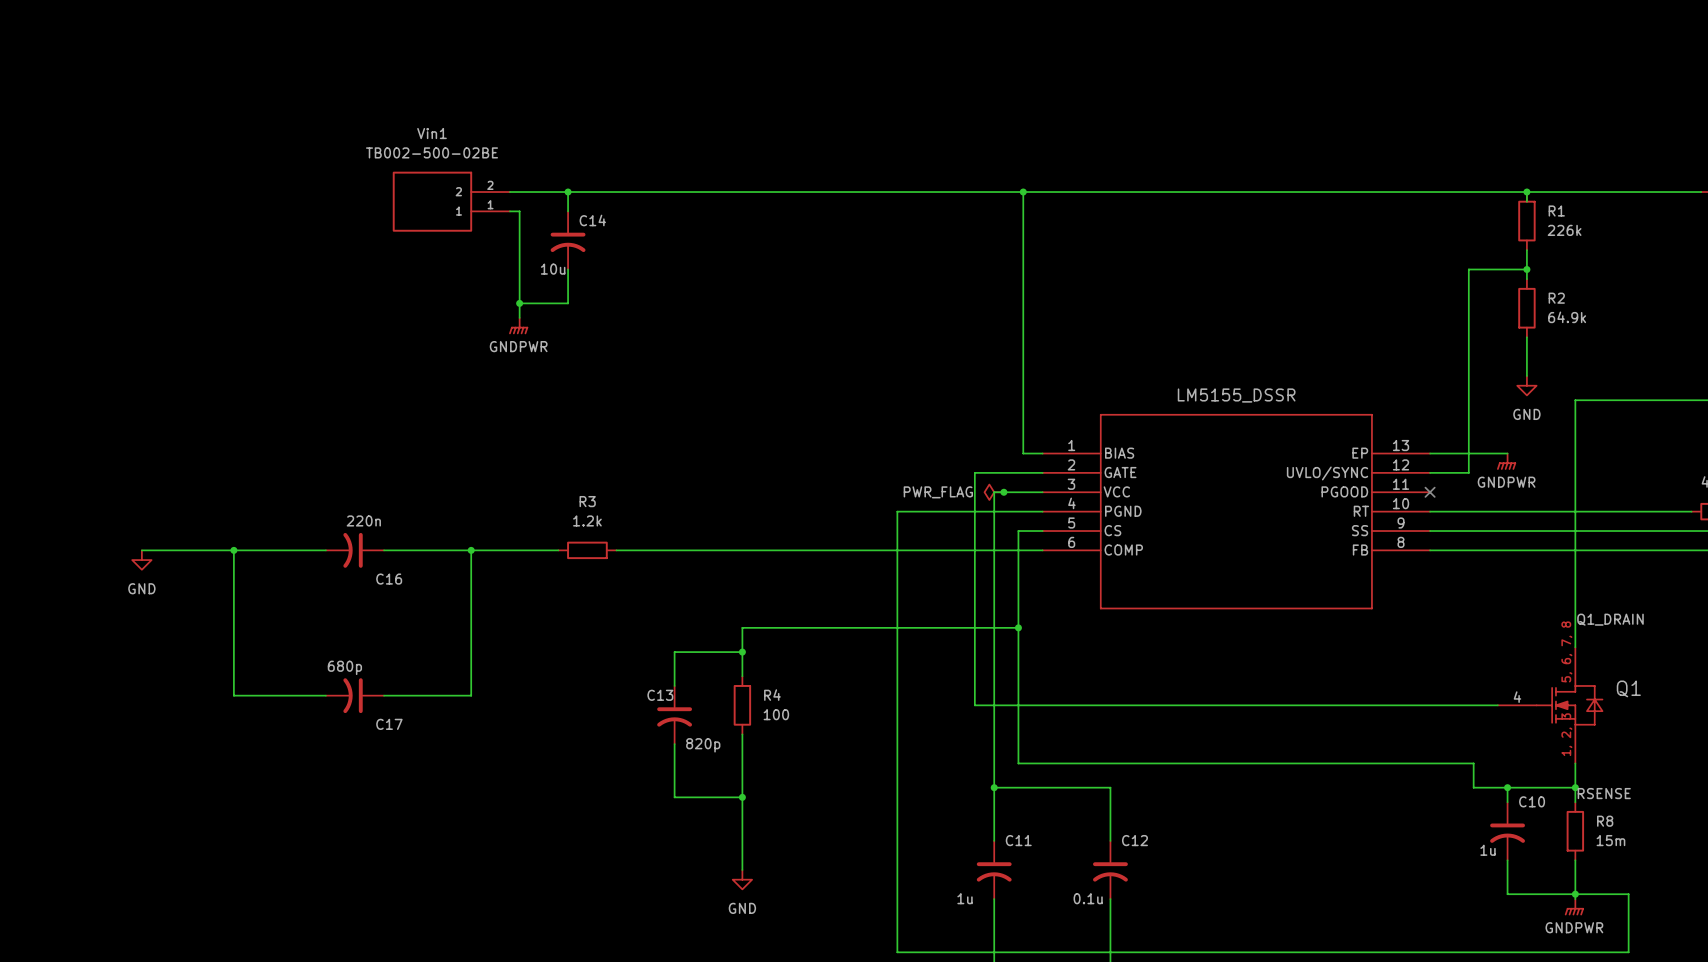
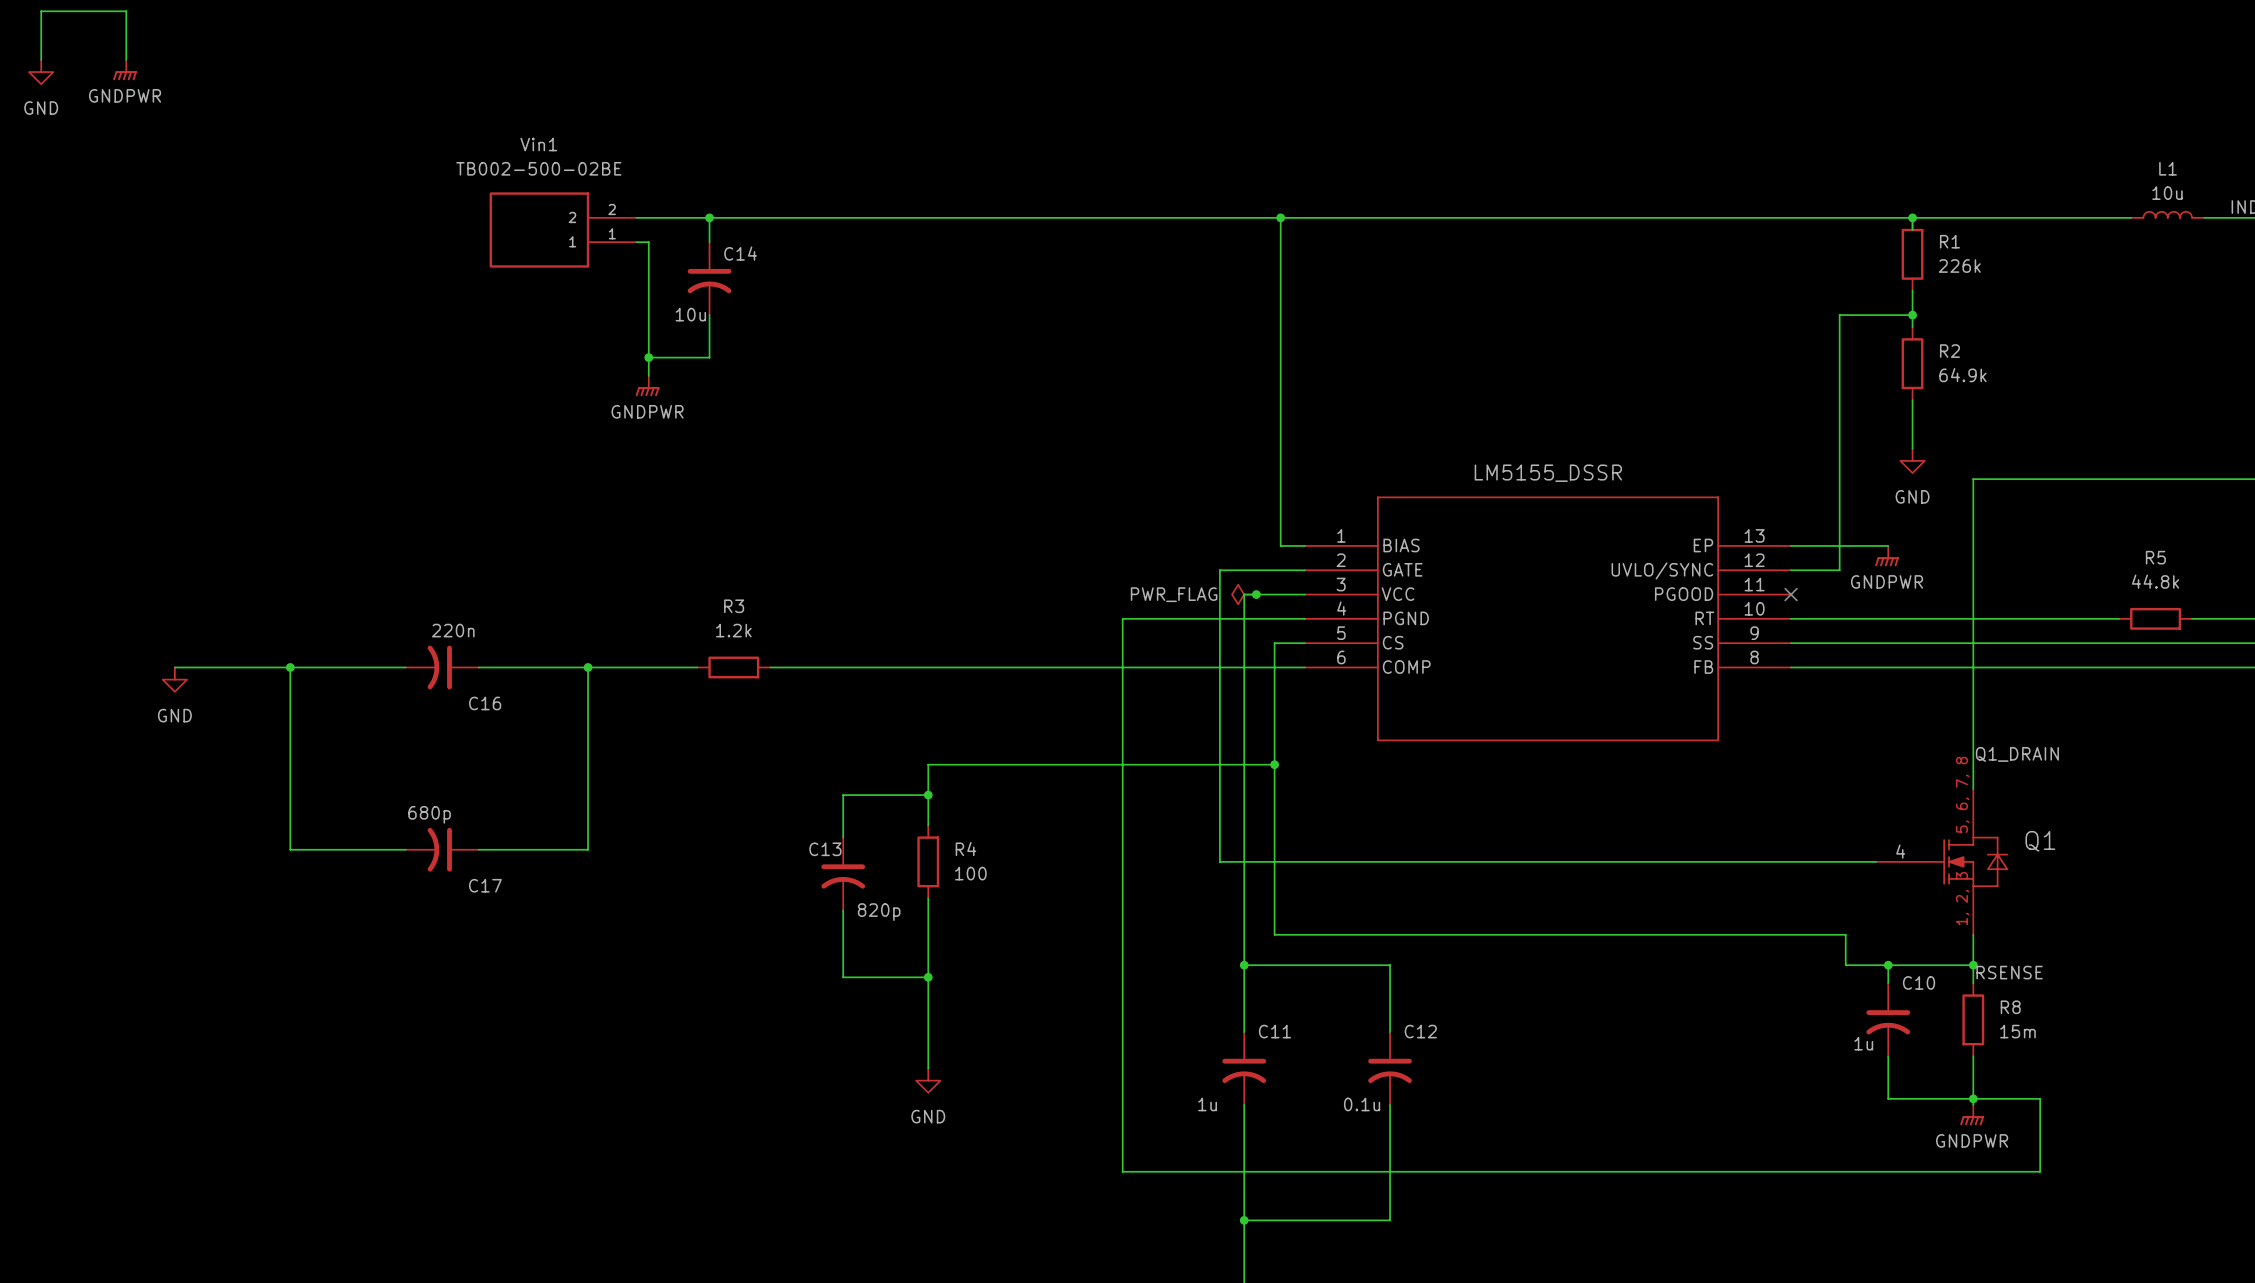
wire: none -> (41, 59) (41, 11) (126, 11) (126, 59)
power symbol: none -> GNDPWR (125, 70)
power symbol: none -> GND (41, 72)

